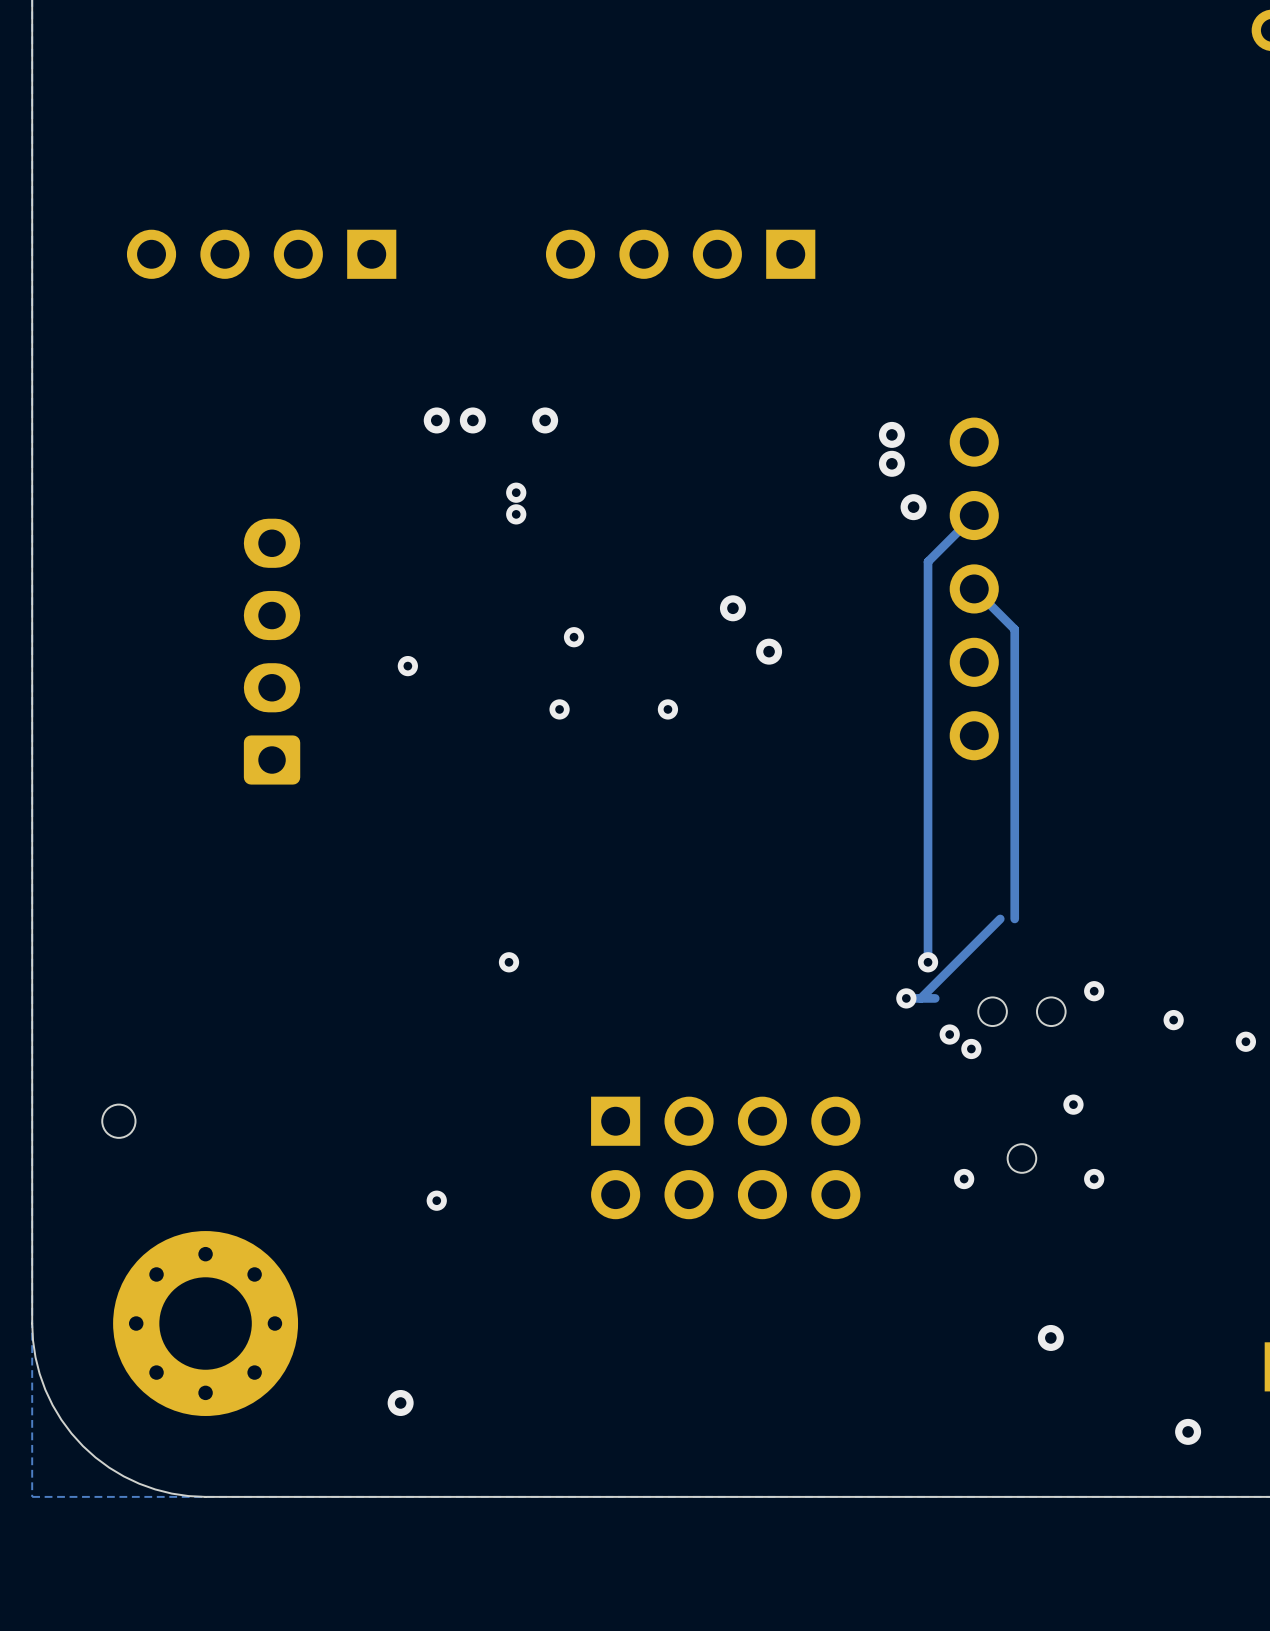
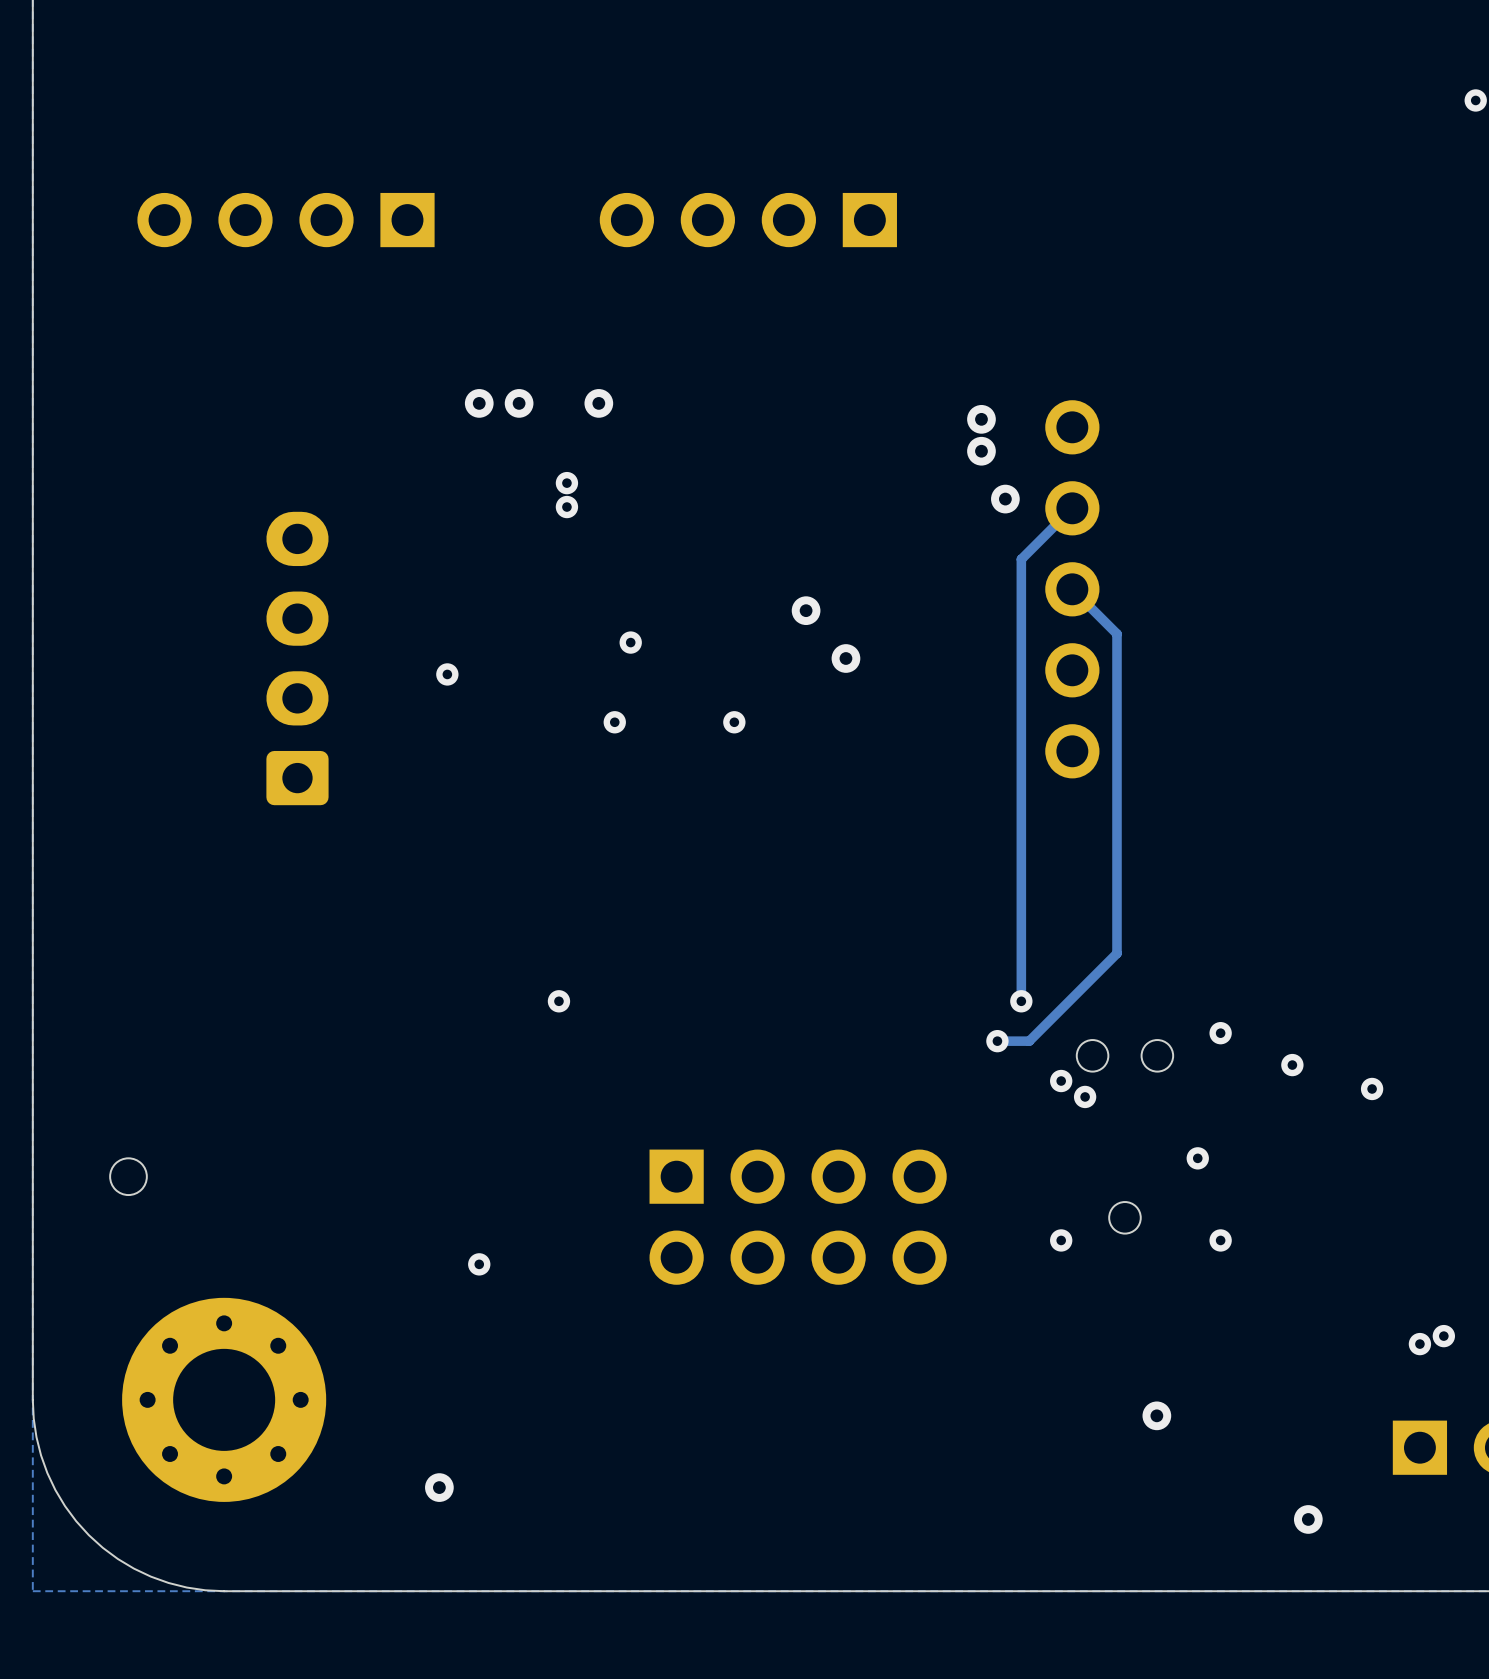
track: (1000, 918) (920, 998) -> (1116, 953) (1029, 1041)
via position: (1094, 991) -> (1220, 1033)
via: (949, 1034) -> none
via: none -> (1061, 1081)
via: (971, 1048) -> none
via: none -> (1085, 1096)
via position: (1073, 1104) -> (1197, 1158)
via position: (1094, 1179) -> (1220, 1240)

